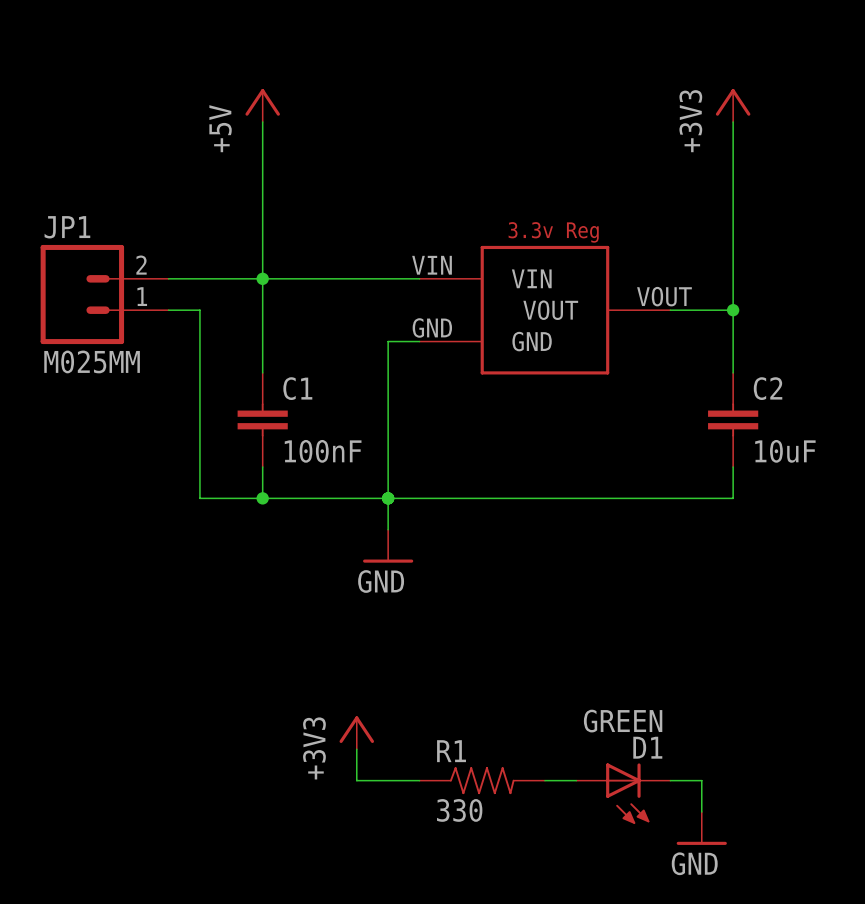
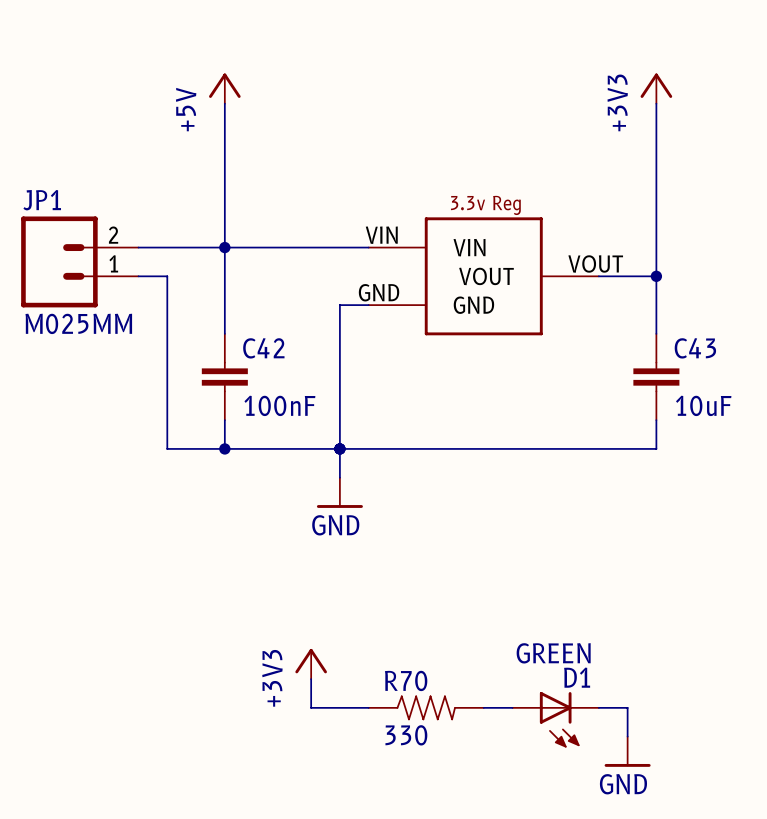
C1 name: C1 (297, 388) -> C42 (263, 348)
C2 name: C2 (768, 388) -> C43 (695, 348)
R1 name: R1 (451, 751) -> R70 (406, 680)

